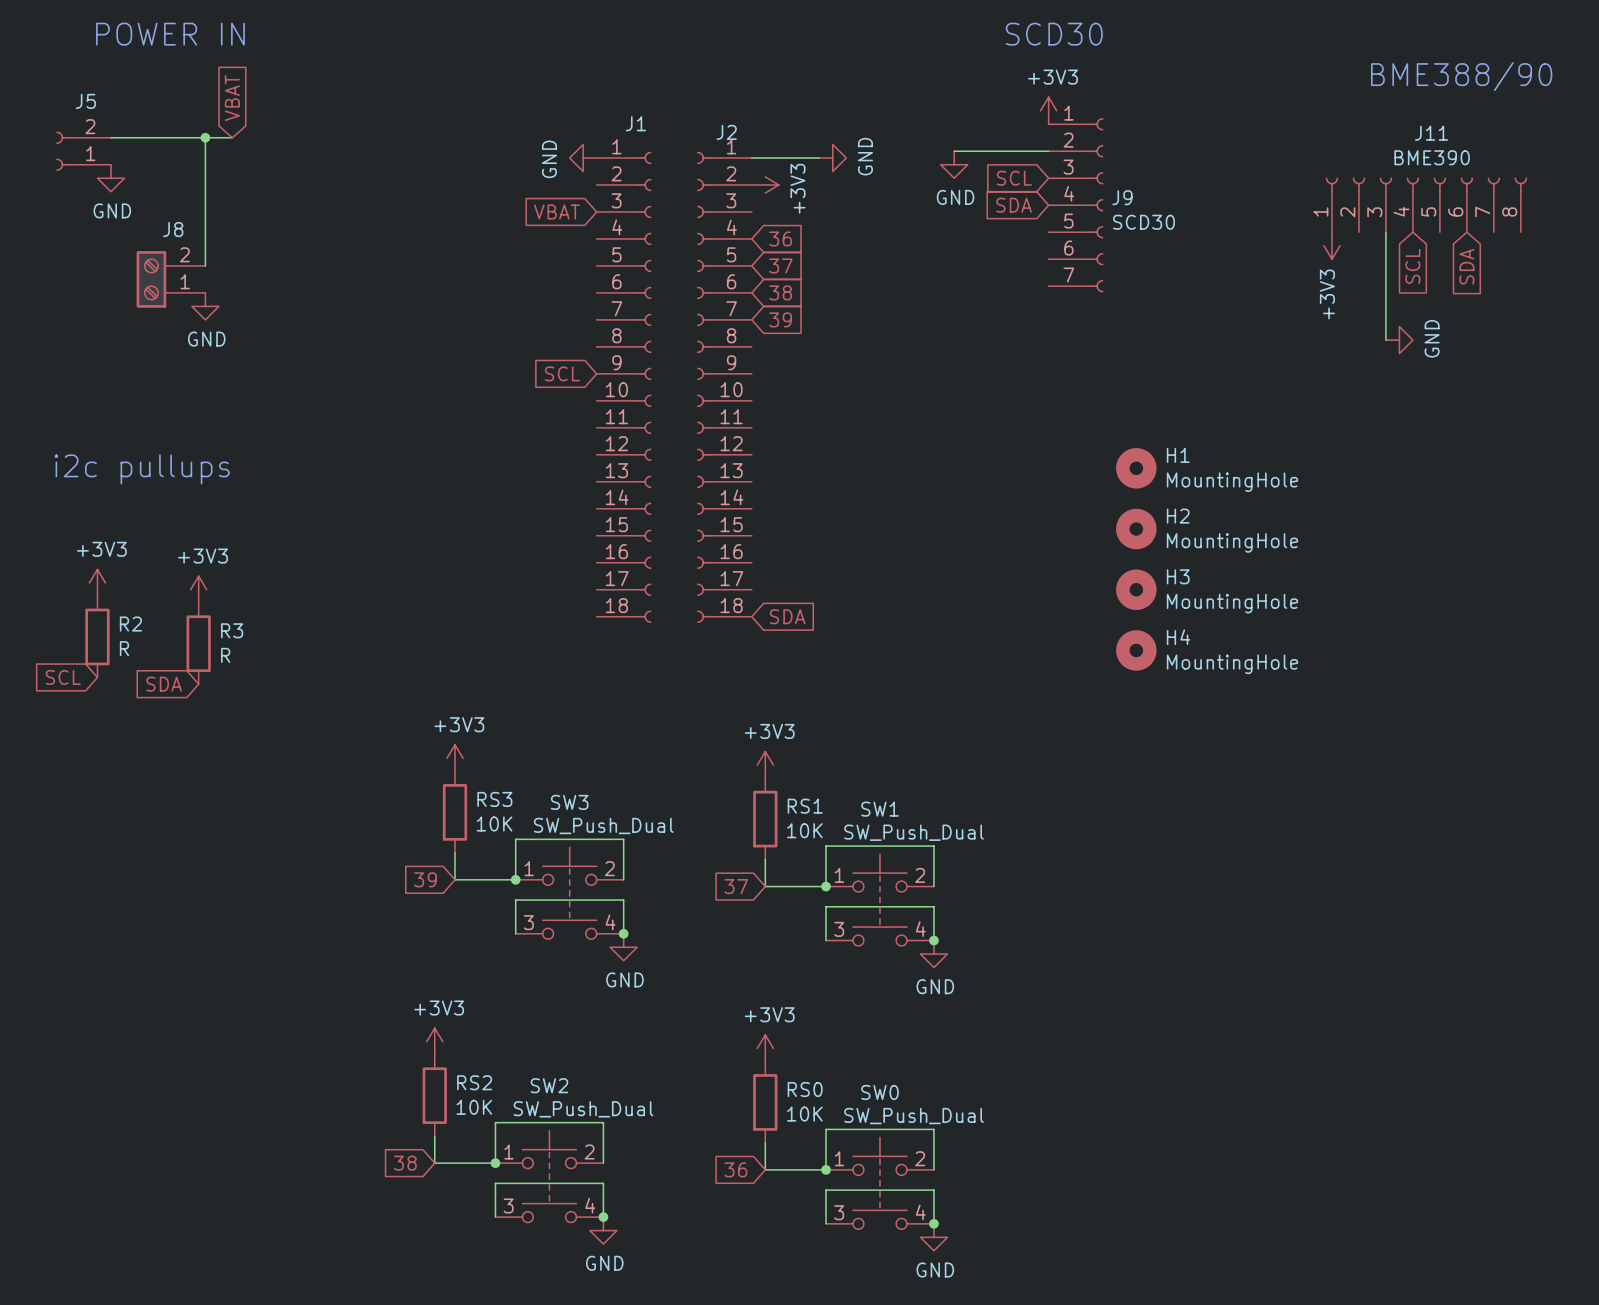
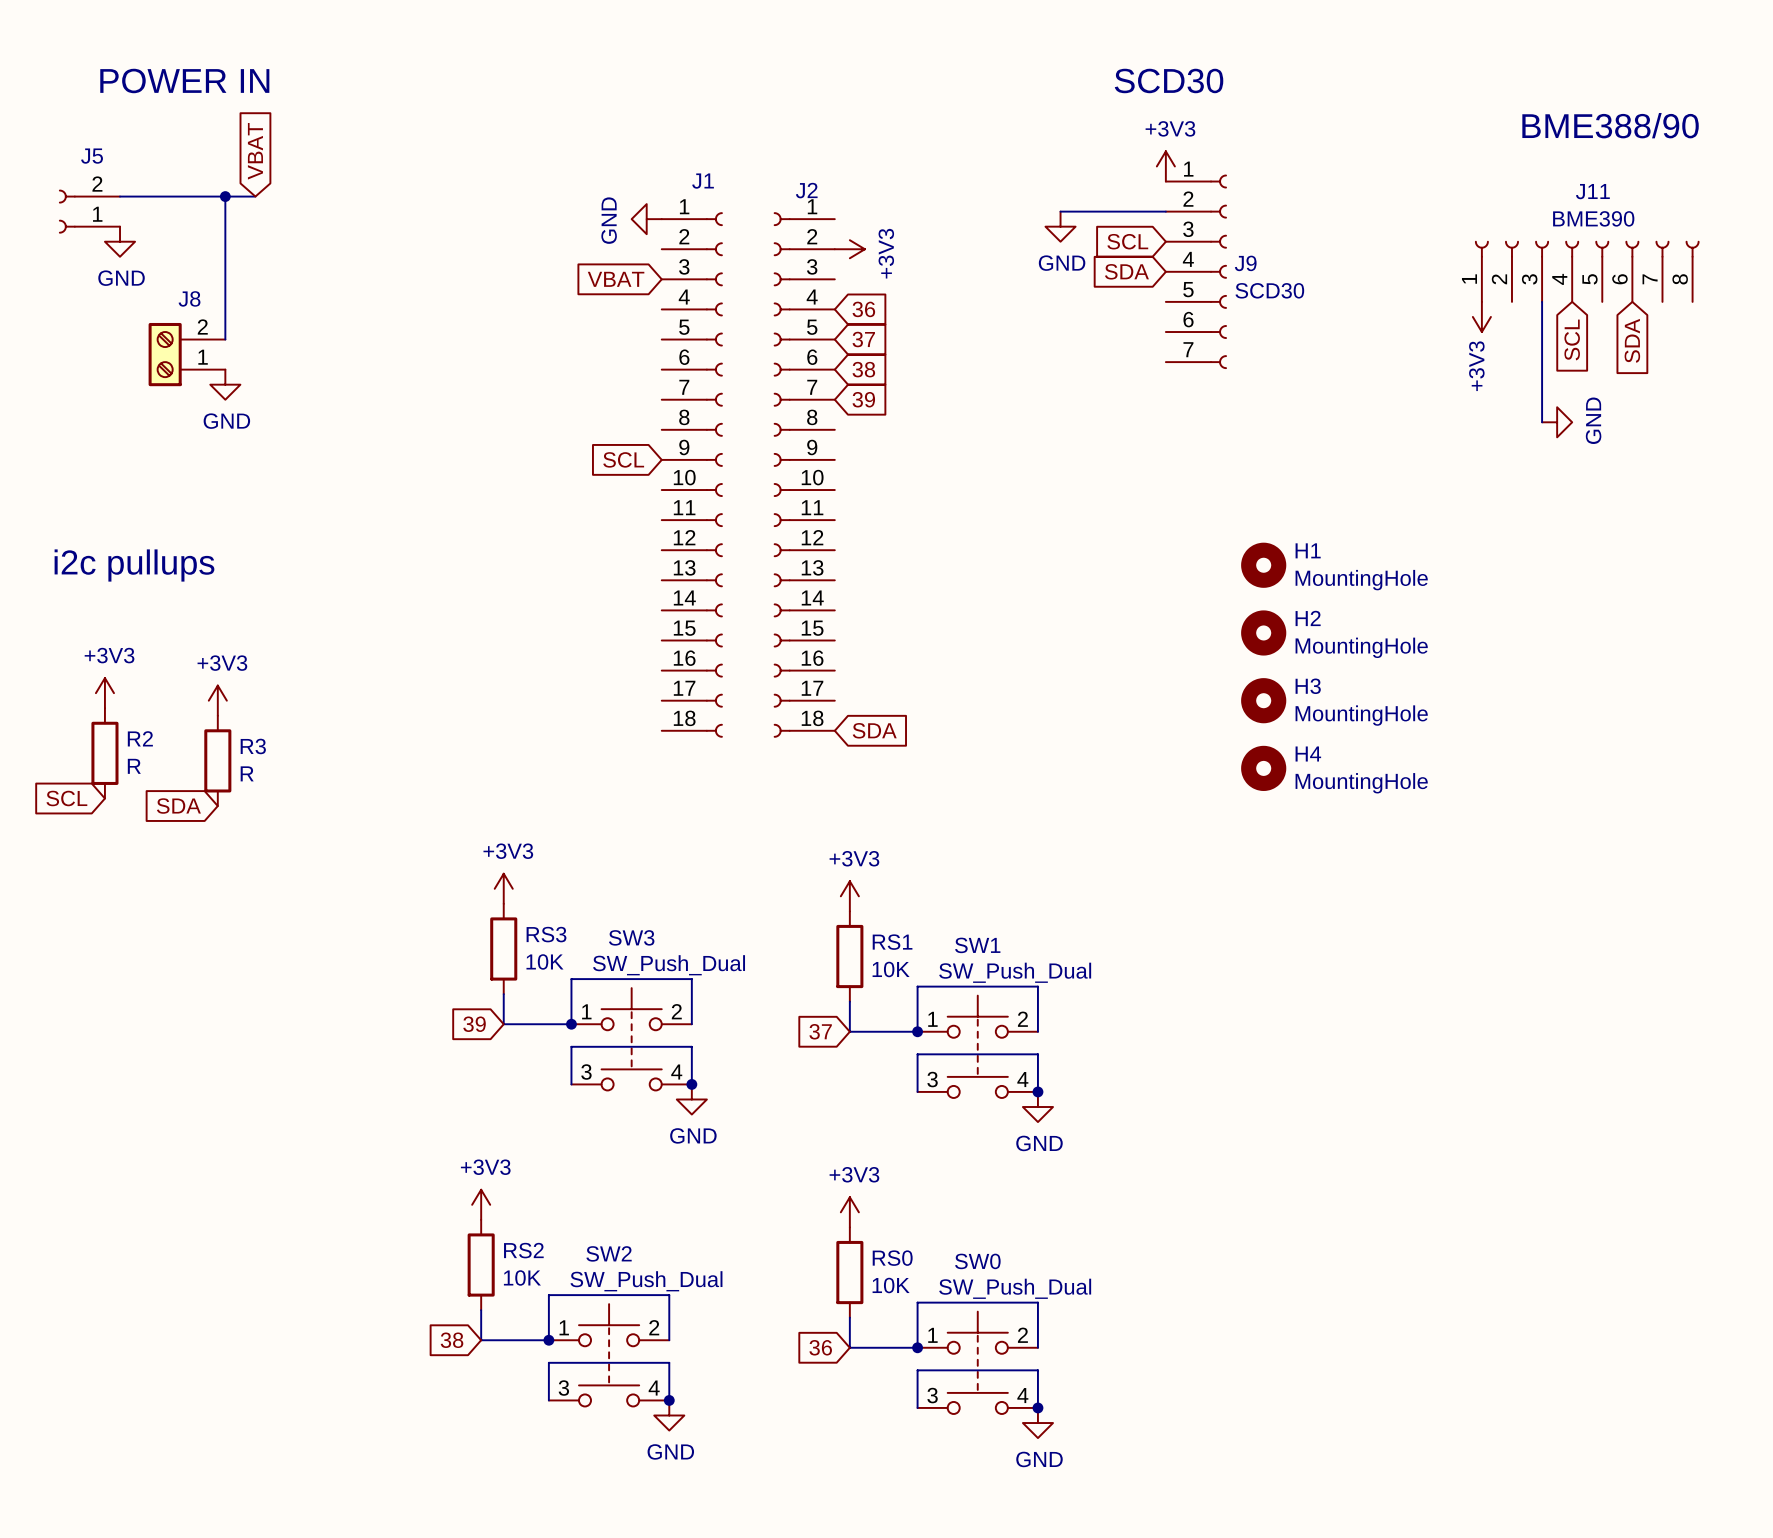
wire: (751, 158) (819, 158) -> none
power symbol: GND (832, 158) -> none

